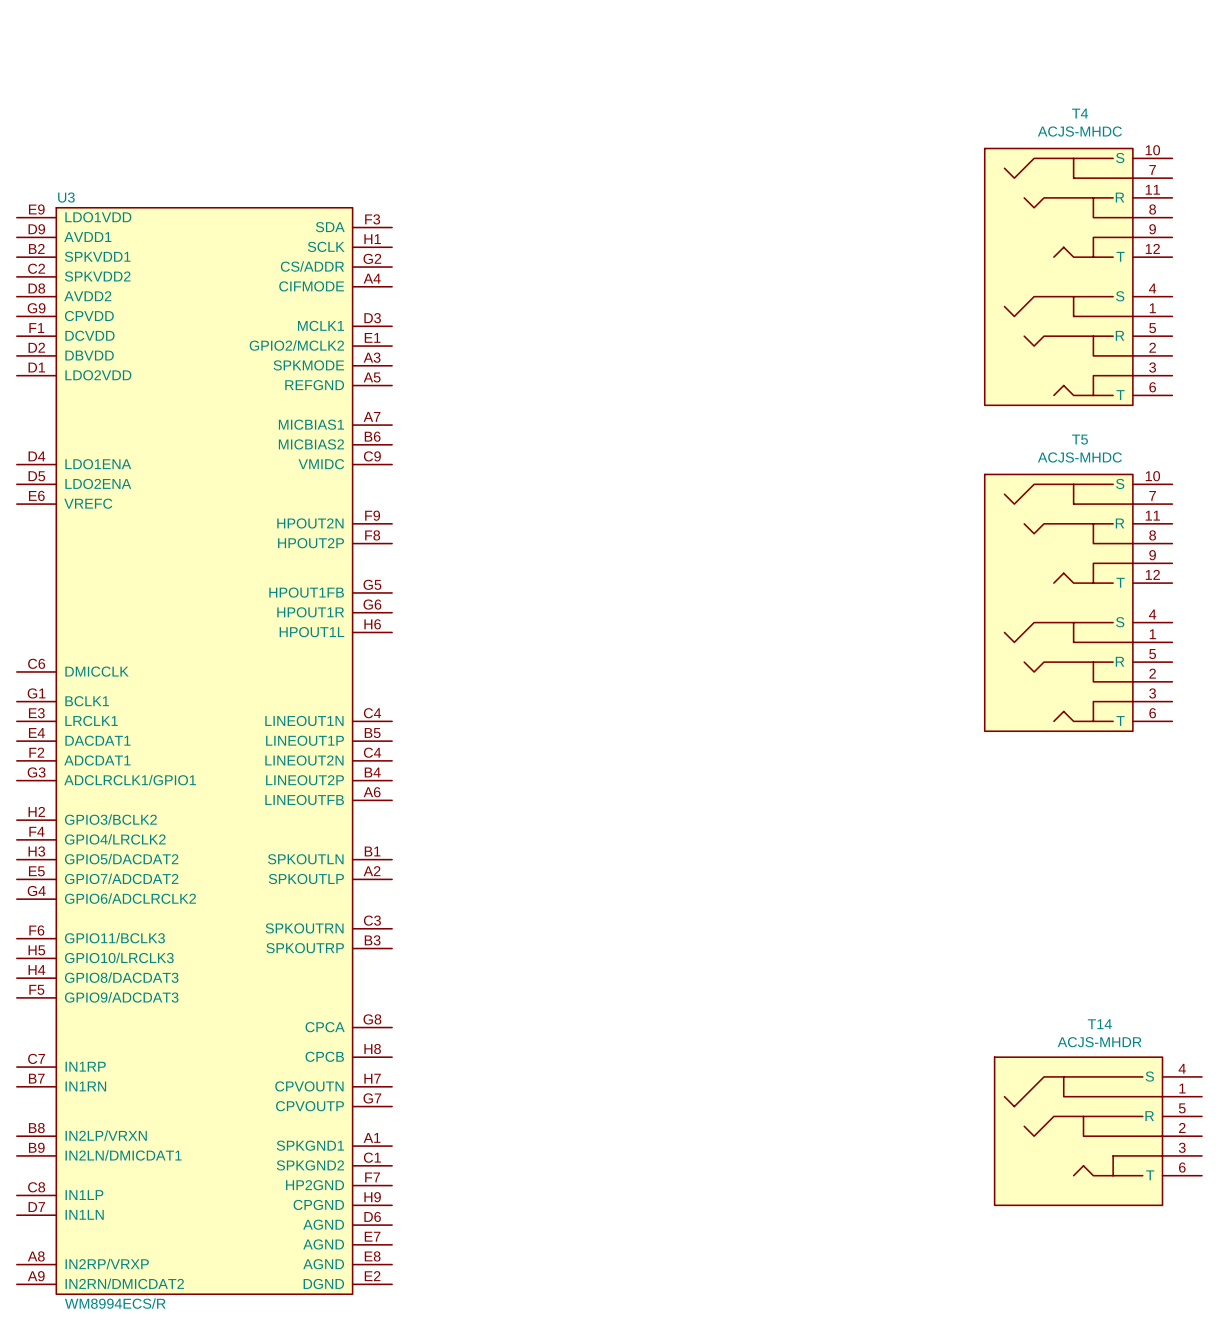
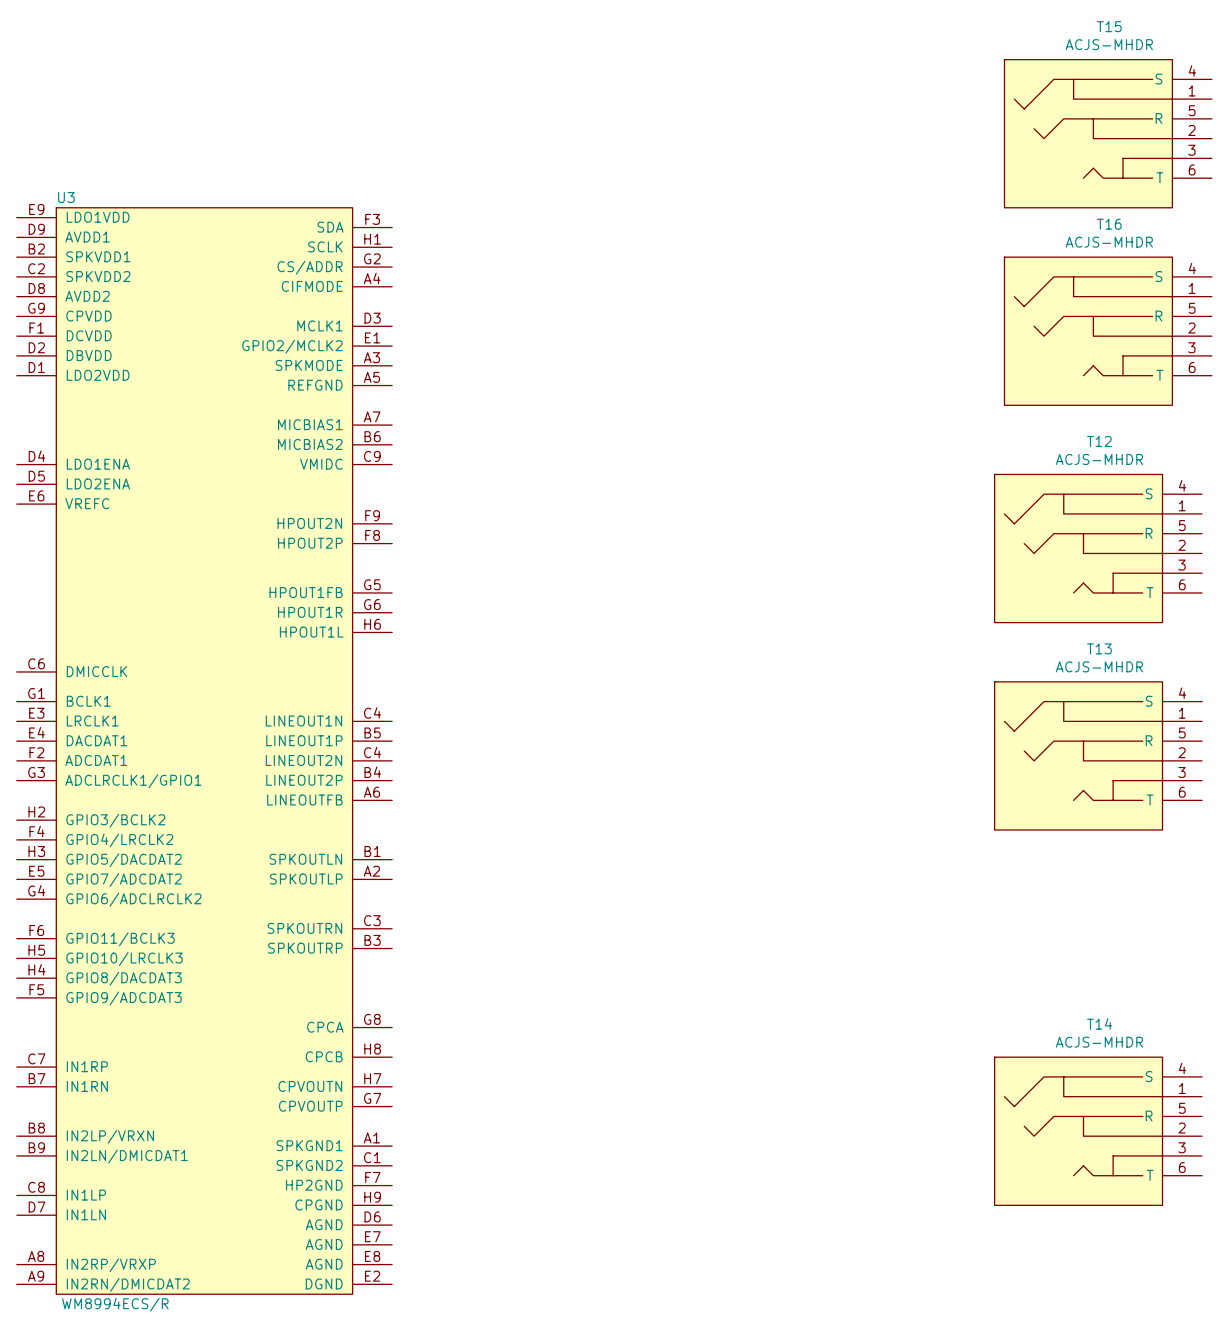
T15: none -> ACJS-MHDR (1108, 133)
T4: ACJS-MHDC (1078, 276) -> none
T16: none -> ACJS-MHDR (1108, 331)
T12: none -> ACJS-MHDR (1098, 548)
T5: ACJS-MHDC (1078, 602) -> none
T13: none -> ACJS-MHDR (1098, 755)

